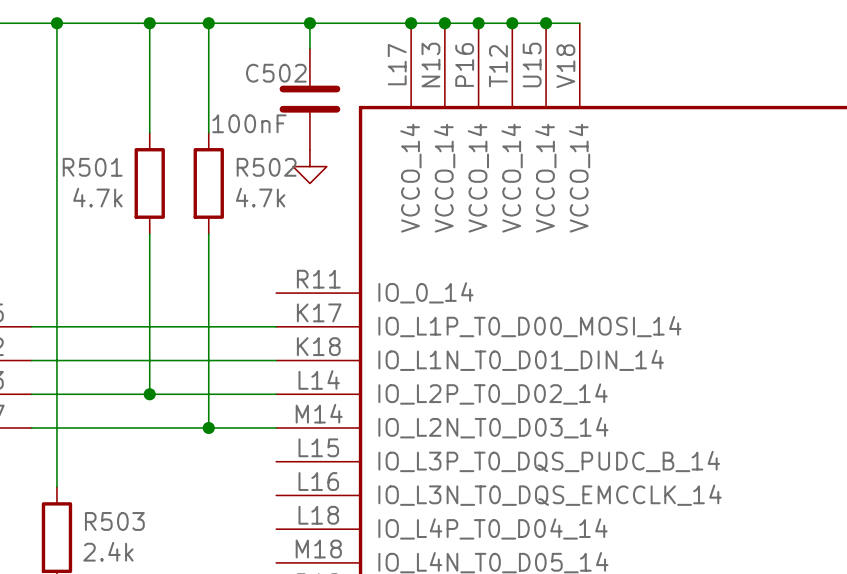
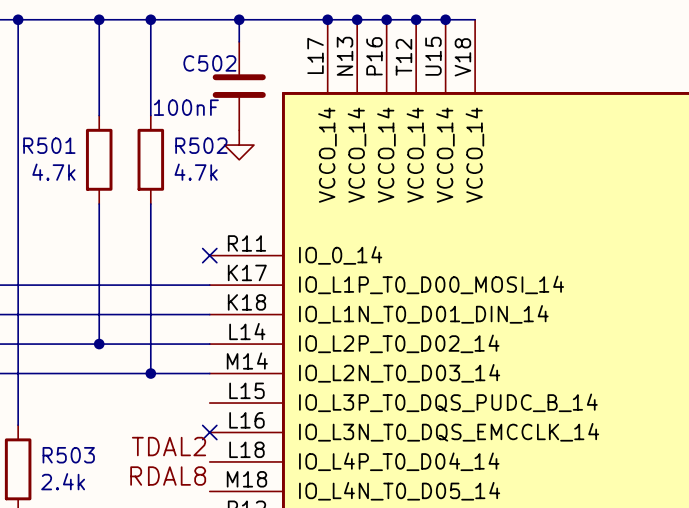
no-connect mark: none -> (209, 255)
no-connect mark: none -> (209, 432)
label: none -> TDAL2 (169, 446)
label: none -> RDAL8 (168, 476)

